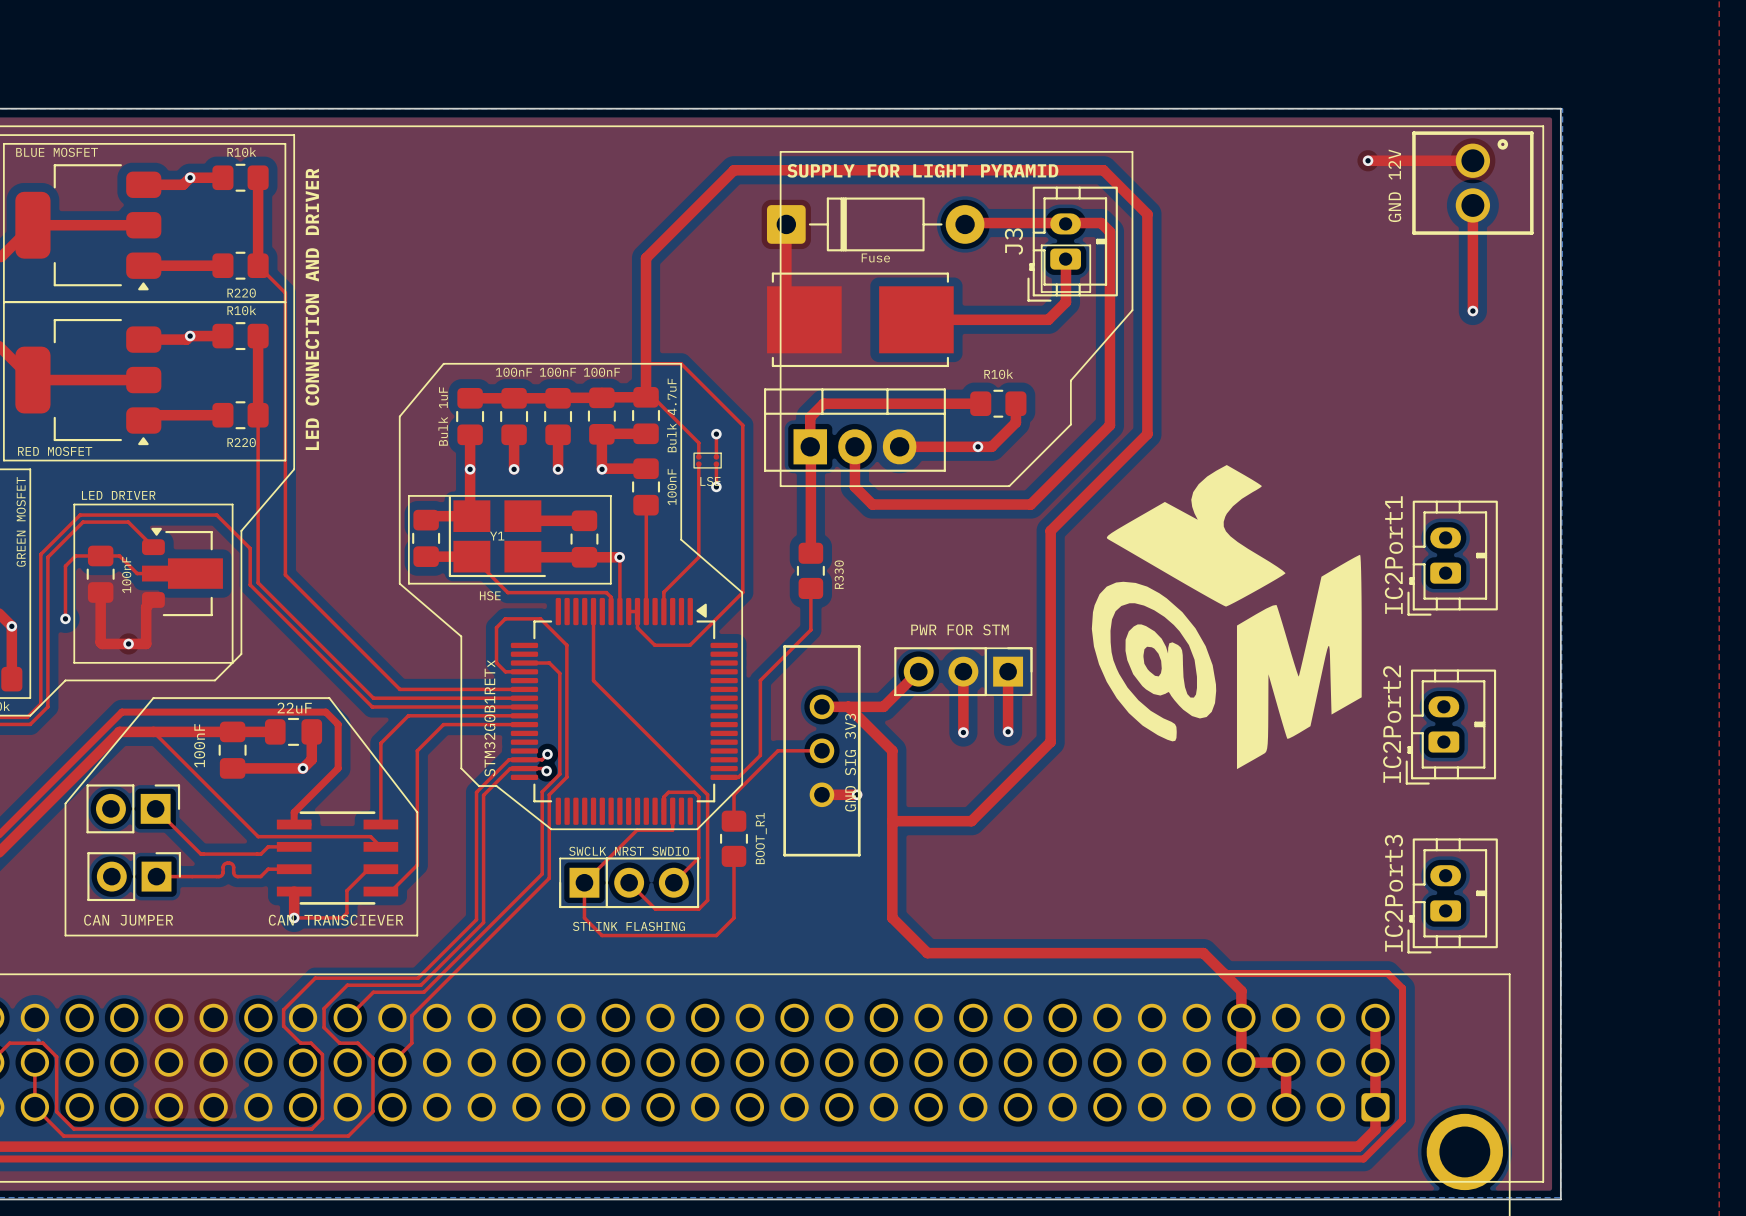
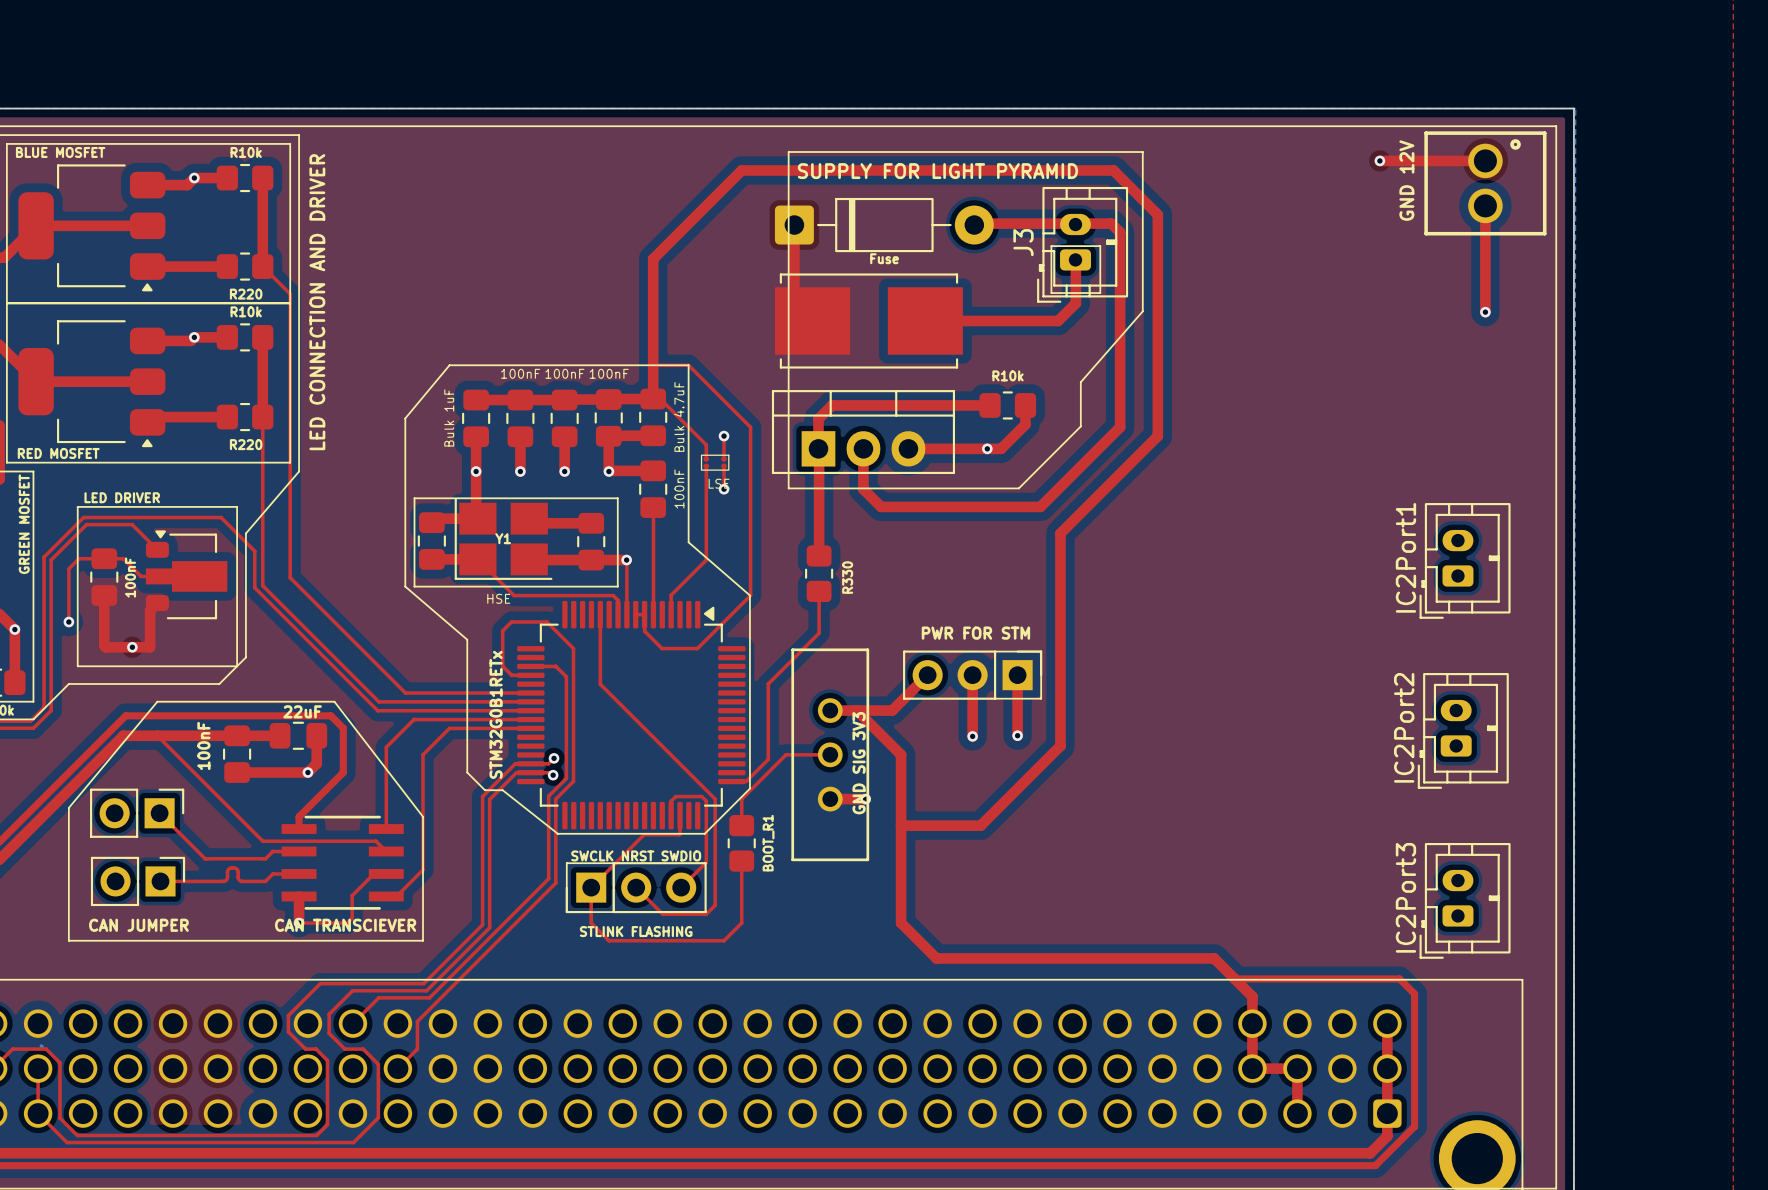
drawing: [1091, 465, 1362, 770] -> none

